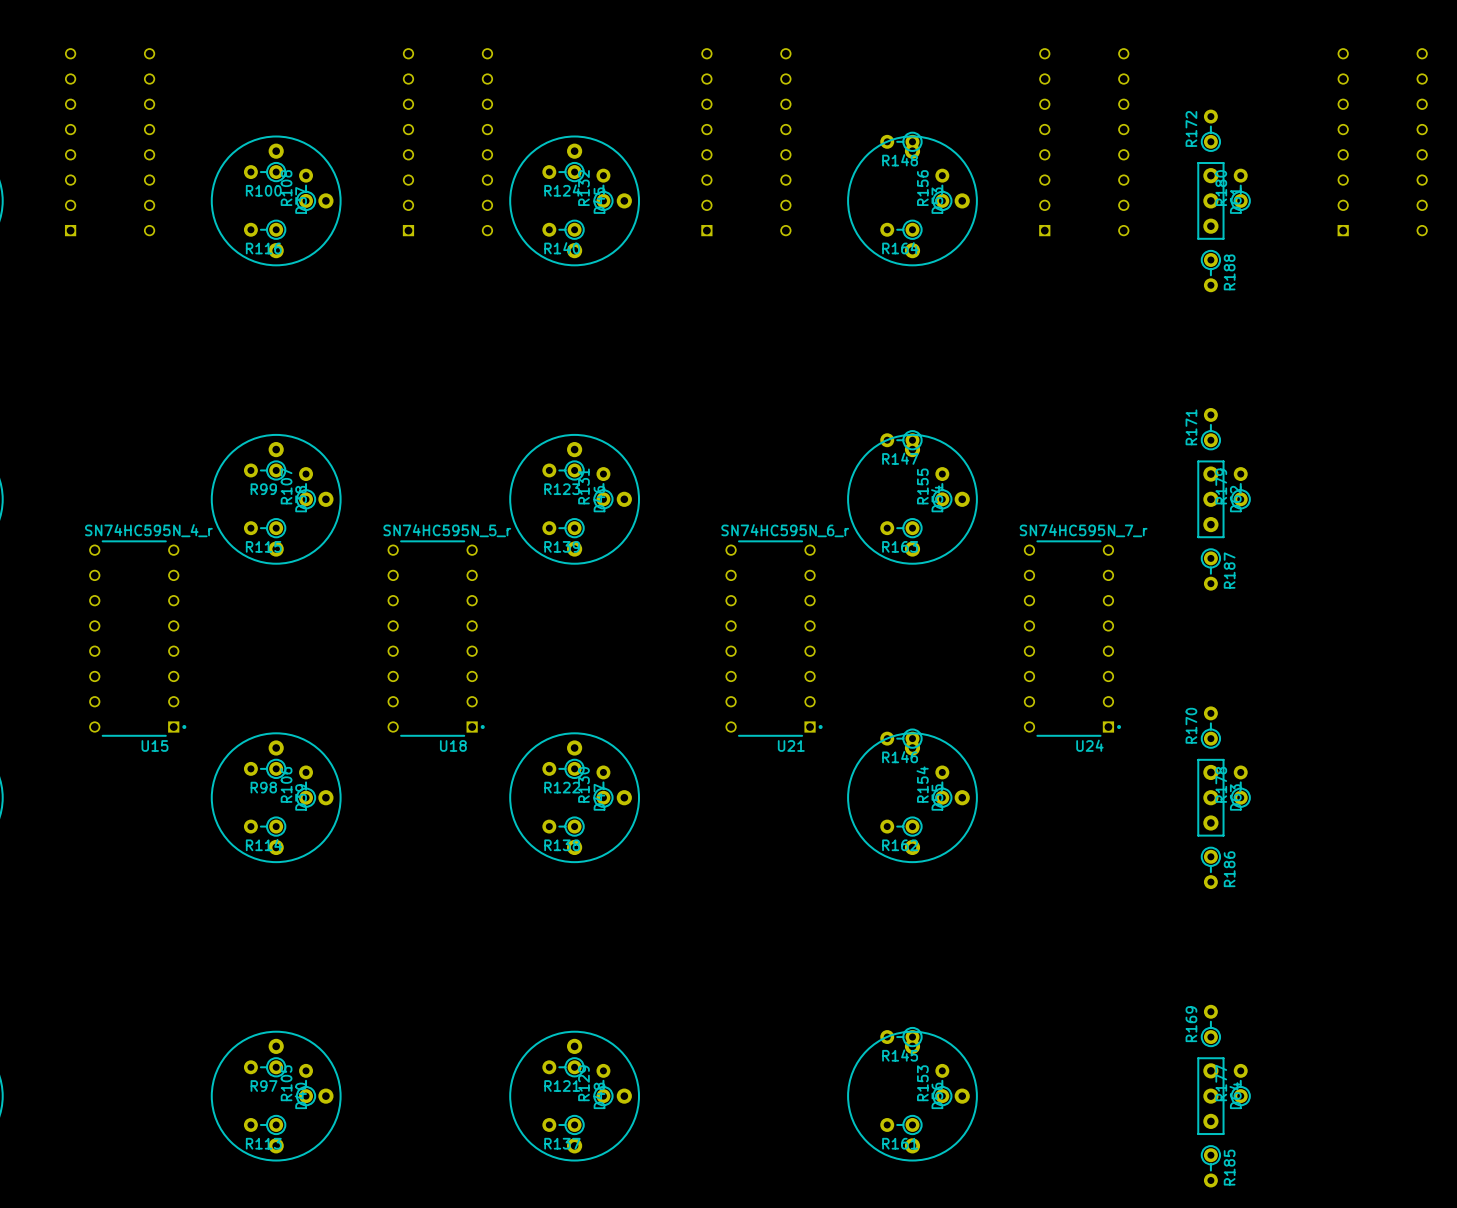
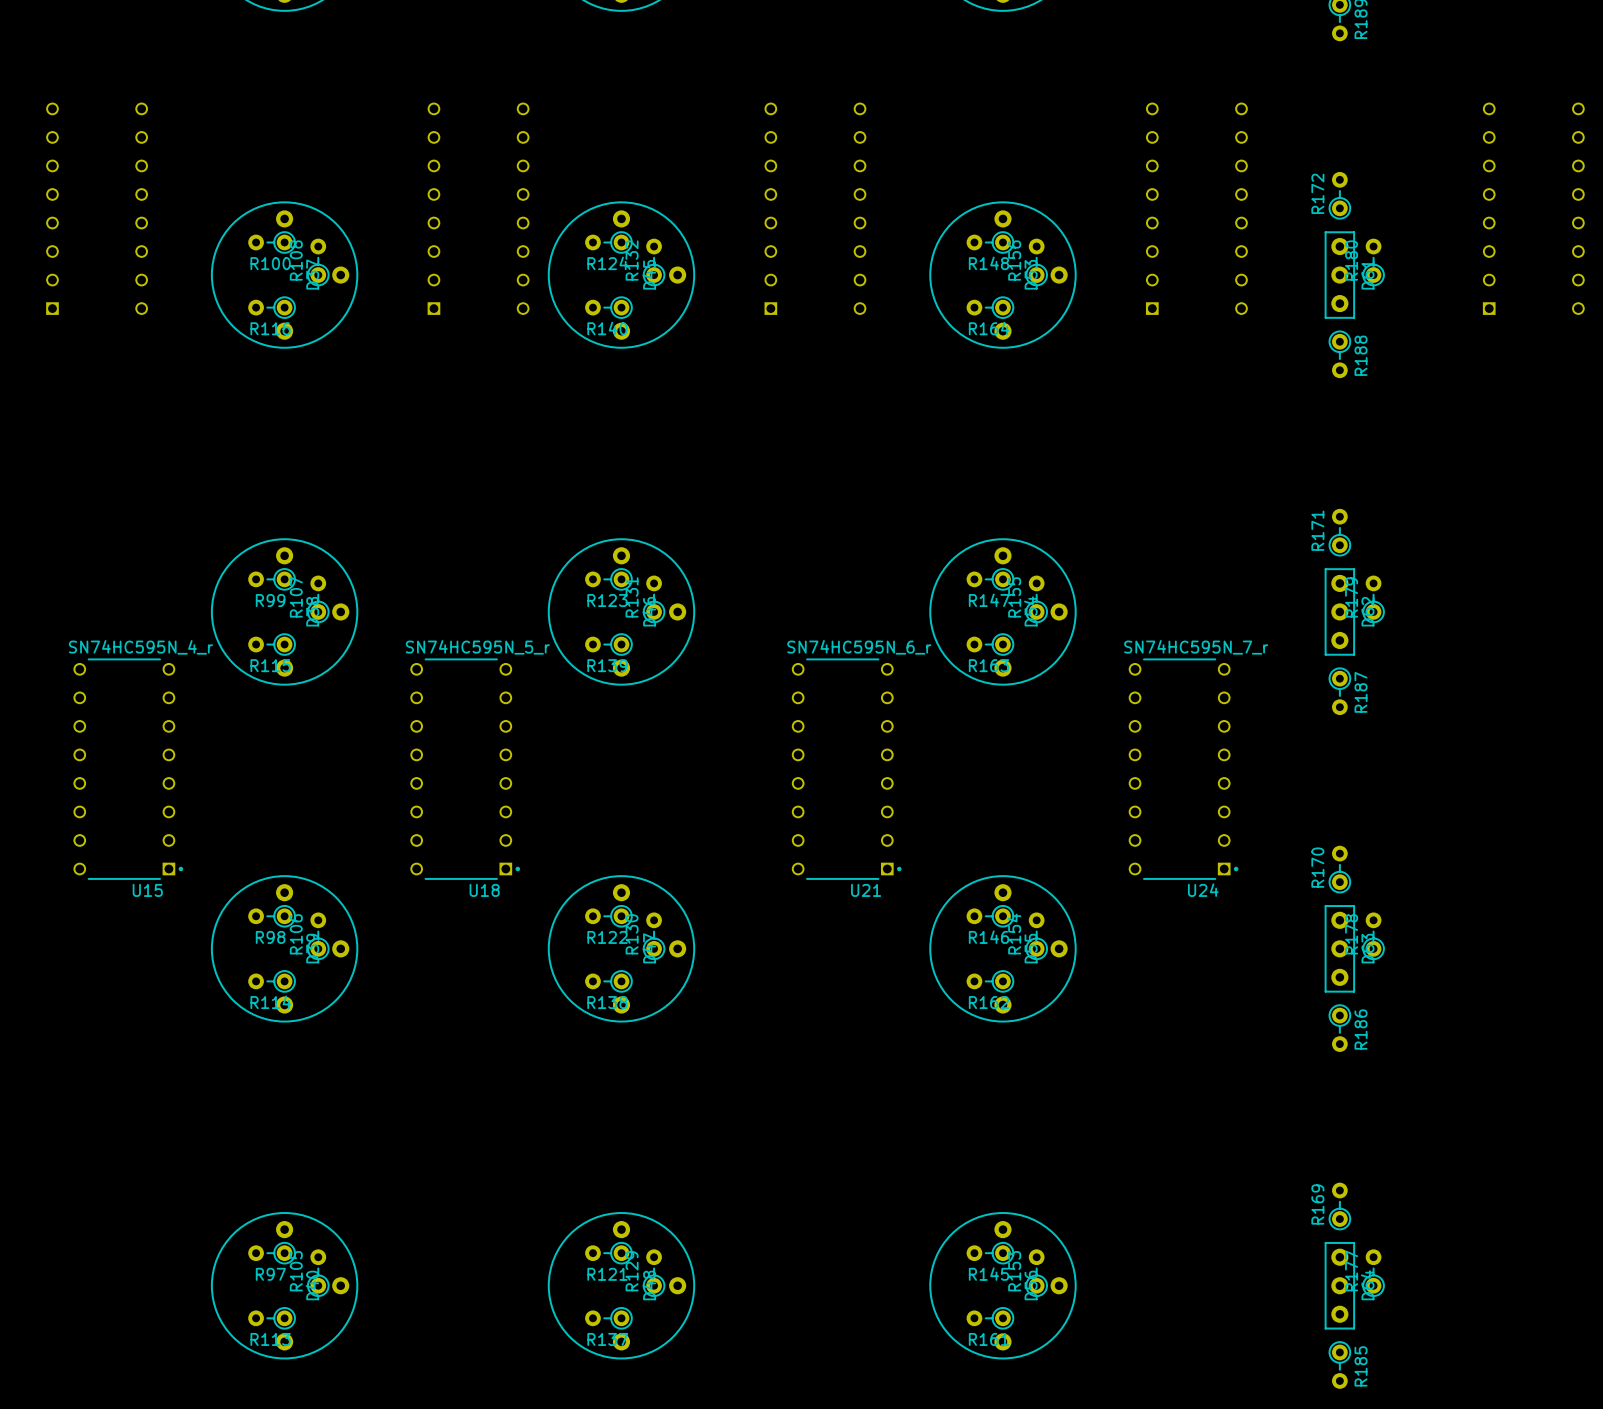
R148 position: (901, 141) -> (990, 242)
R147 position: (901, 440) -> (990, 579)
R146 position: (901, 738) -> (990, 916)
R145 position: (901, 1037) -> (990, 1253)

